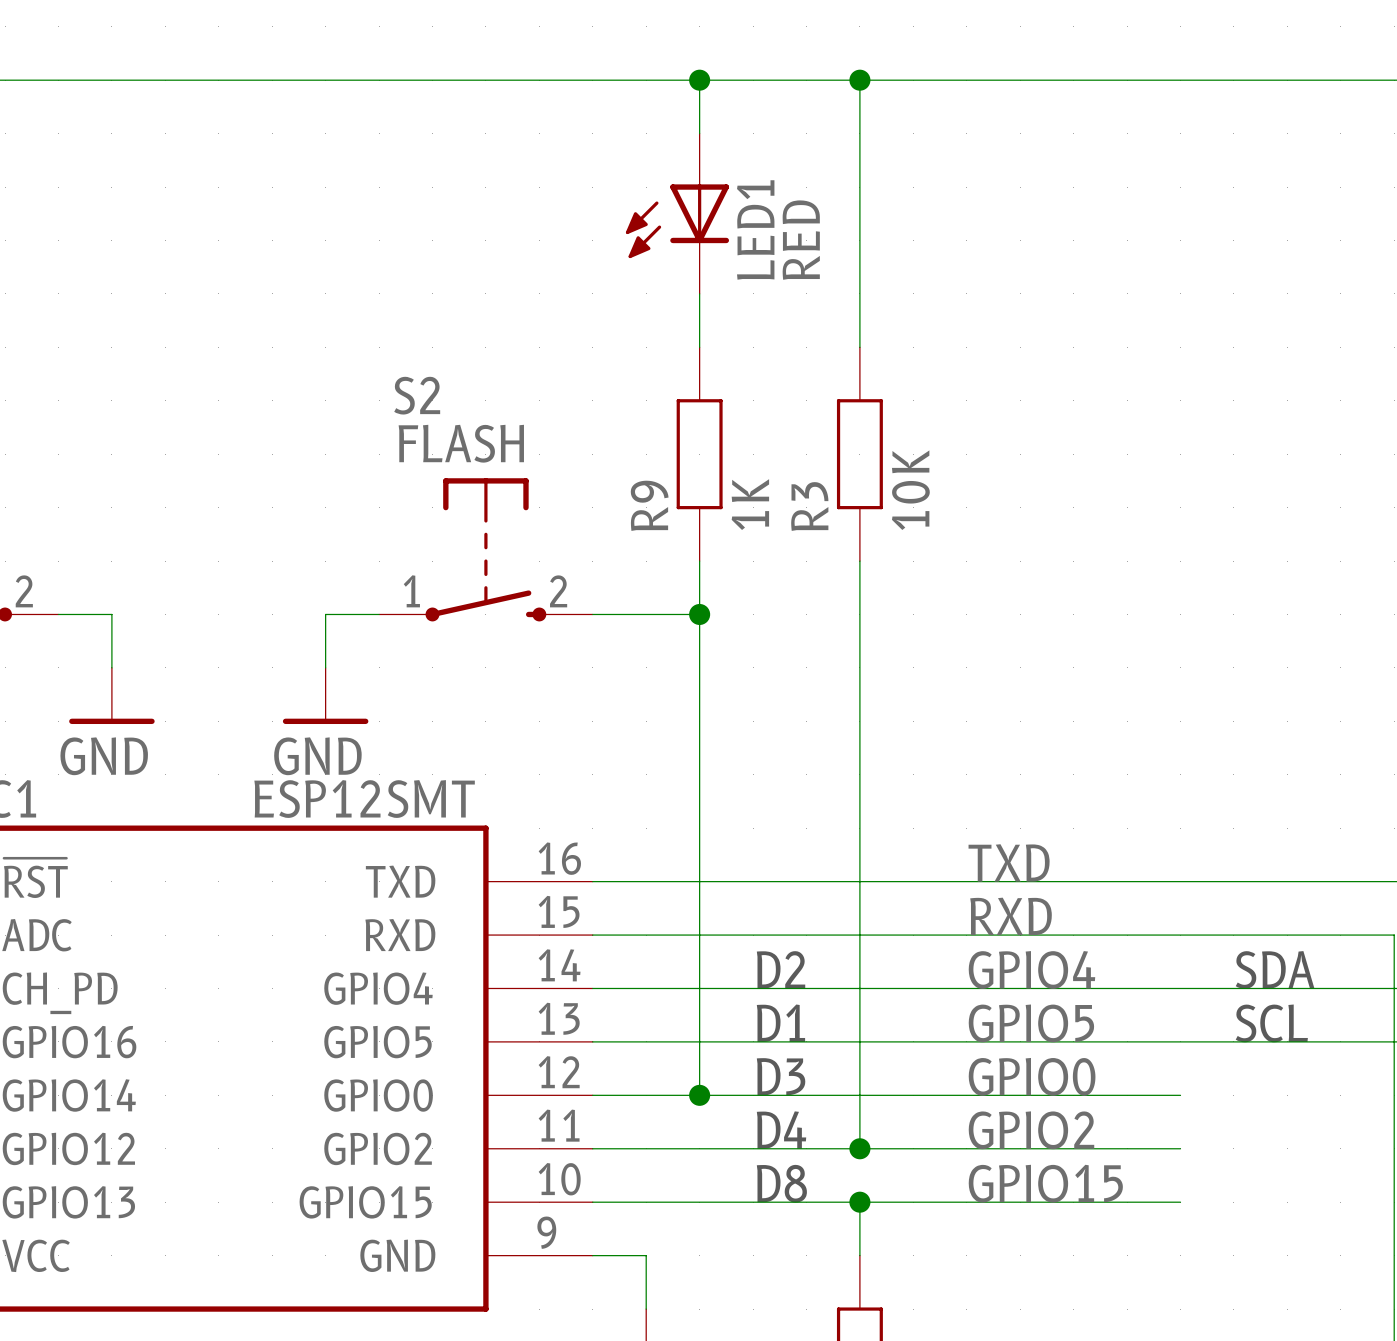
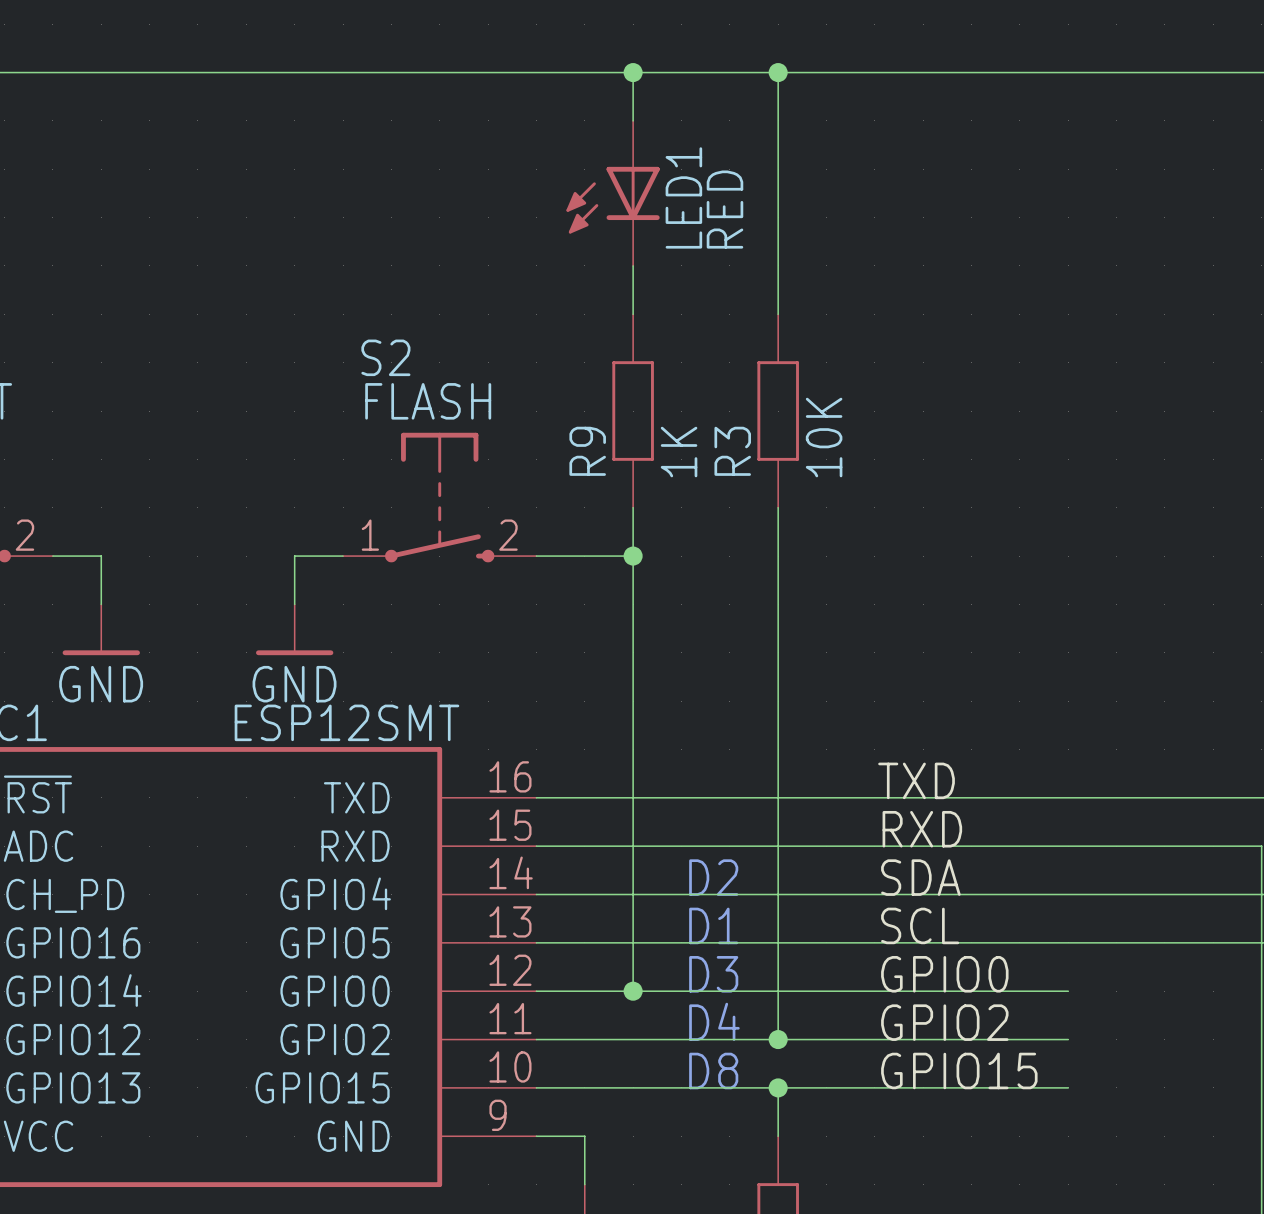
label: GPIO4 (1031, 969) -> SDA (920, 877)
text: SDA (1275, 969) -> none
label: GPIO5 (1031, 1023) -> SCL (920, 925)
text: SCL (1271, 1023) -> none

